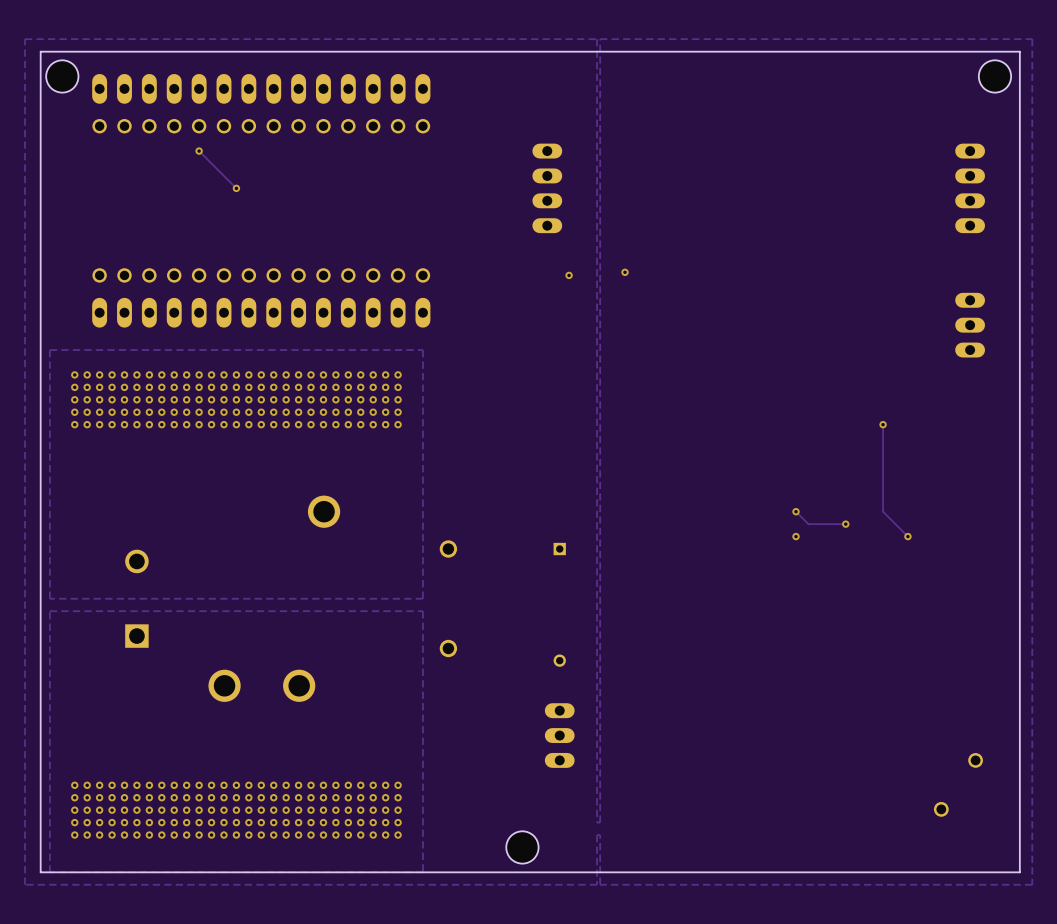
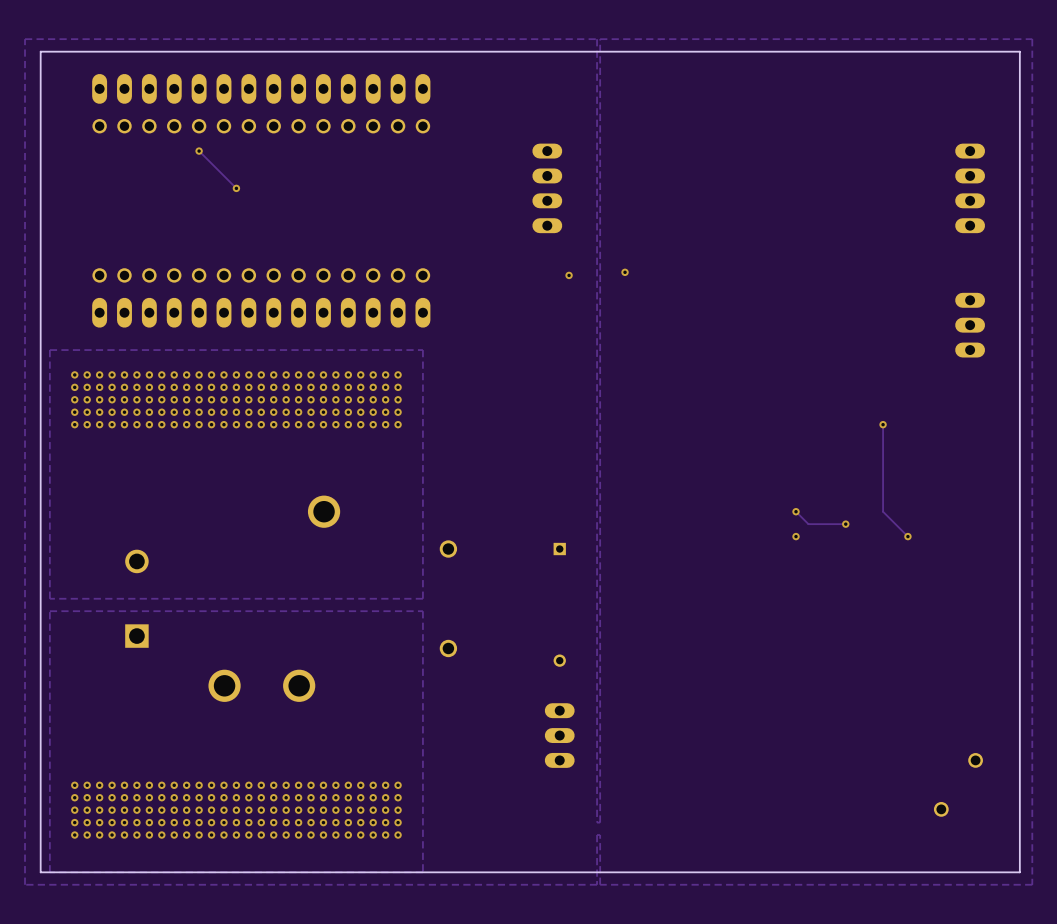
hole: (62, 76) -> none
hole: (994, 76) -> none
hole: (522, 847) -> none

